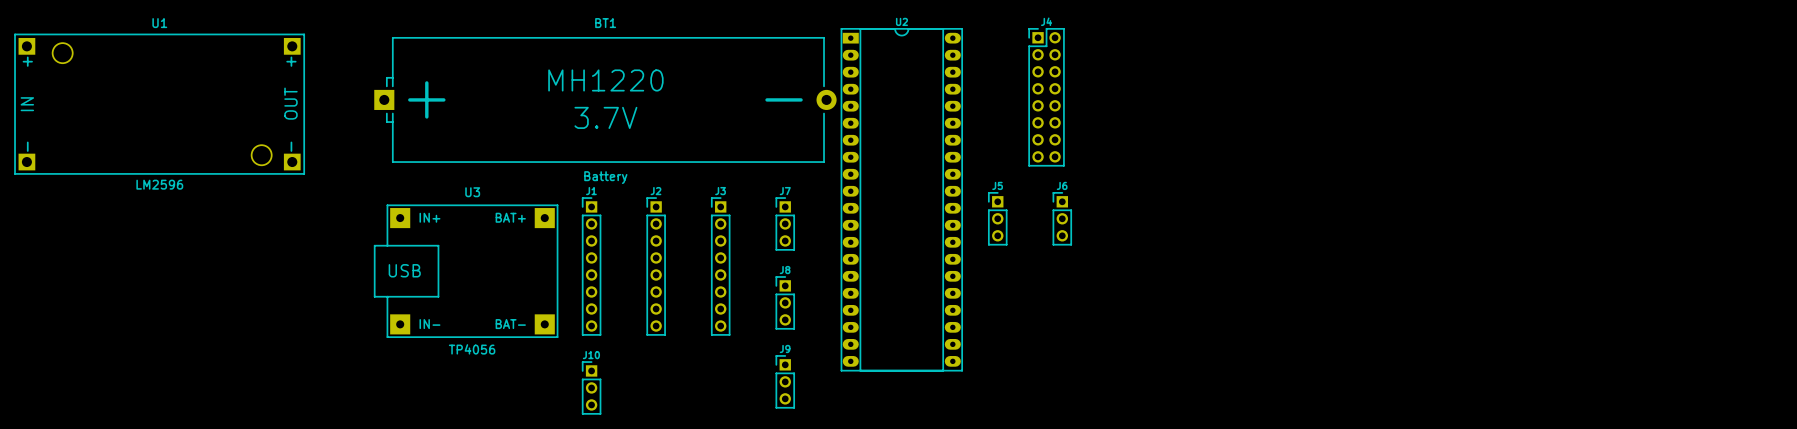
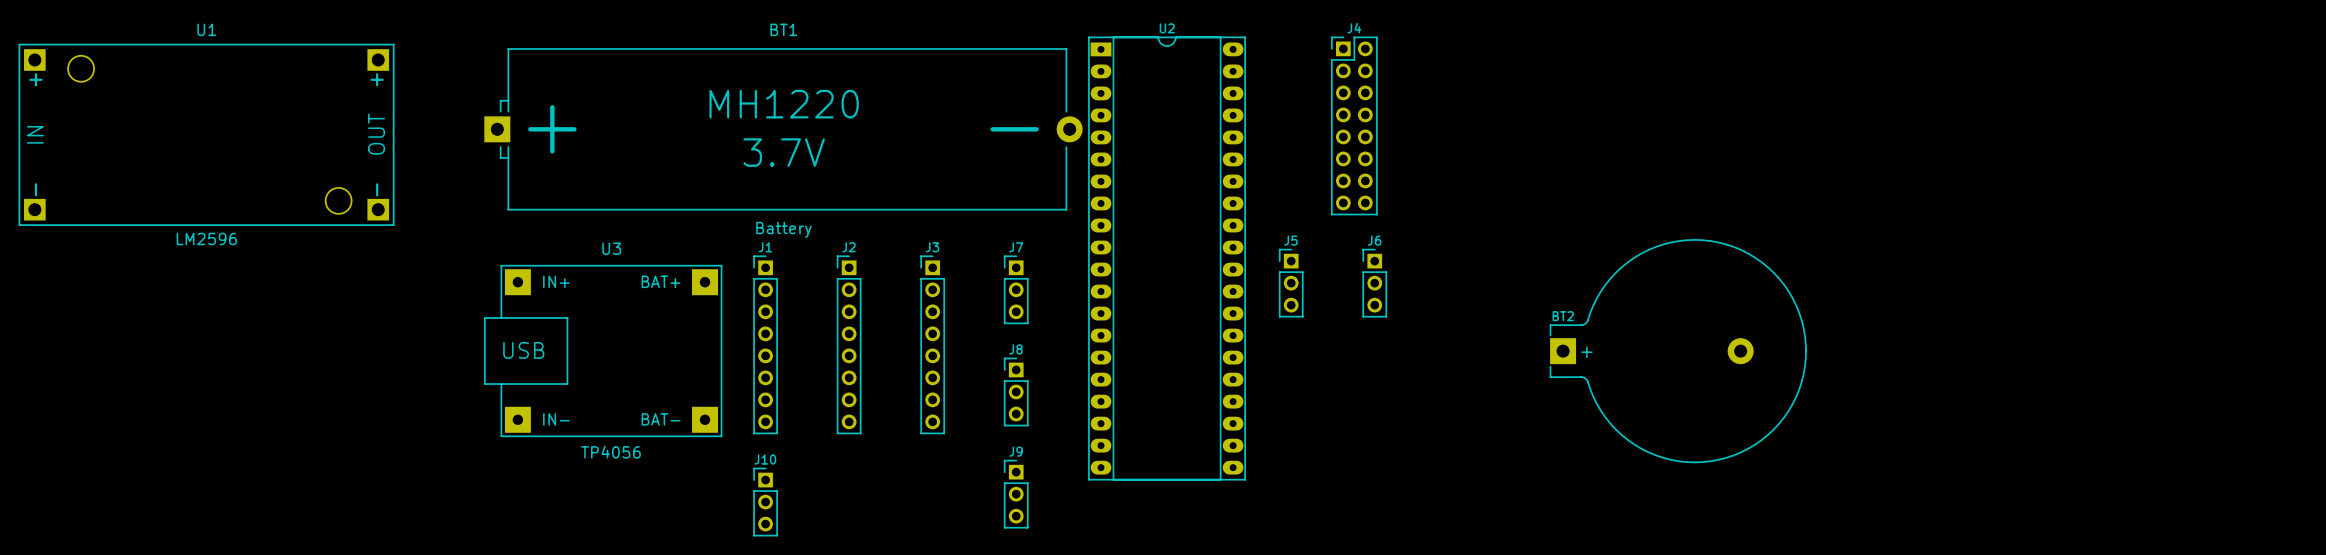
BT2: none -> (1678, 351)

